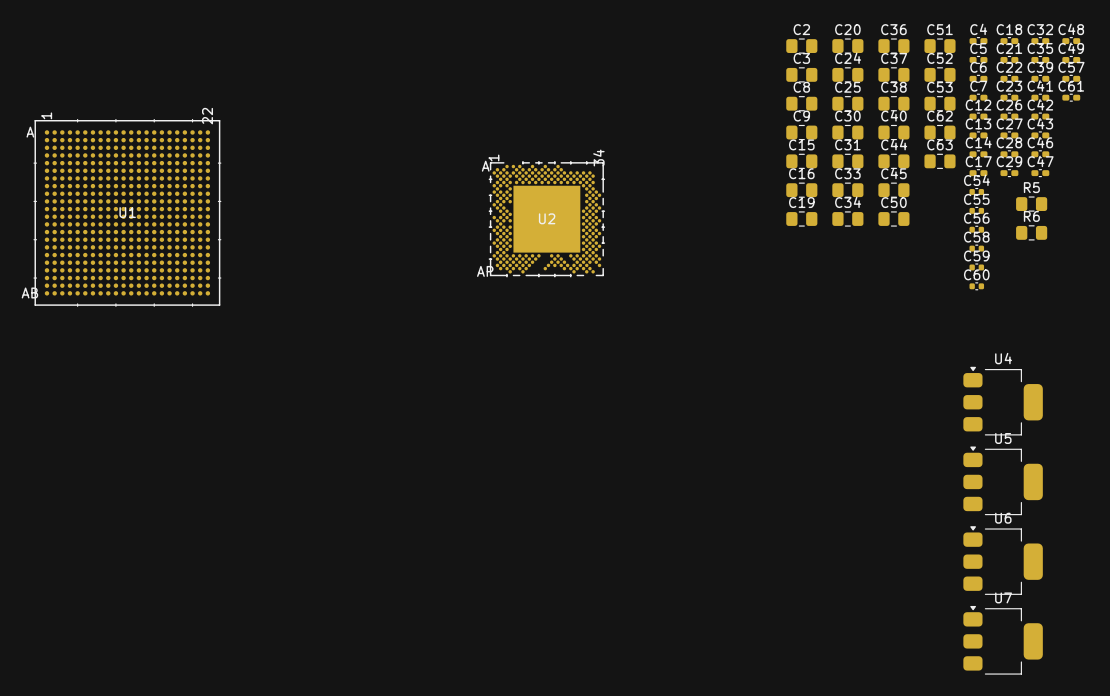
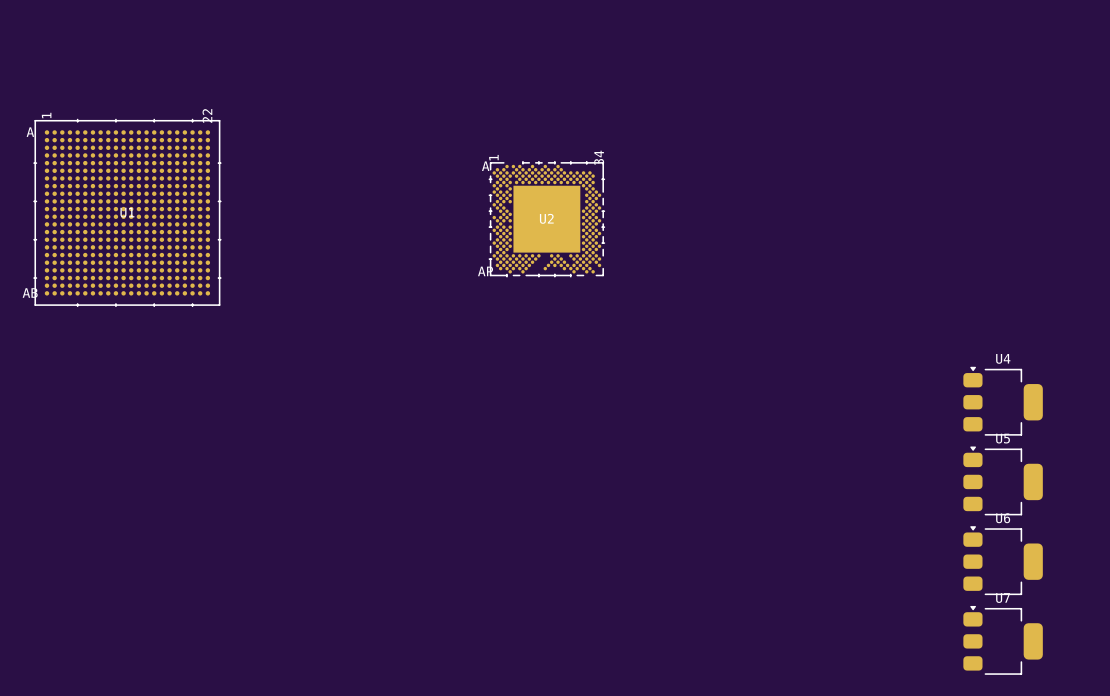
C4: (978, 41) -> none
C18: (1009, 41) -> none
C32: (1040, 41) -> none
C48: (1071, 41) -> none
C2: (801, 46) -> none
C20: (847, 46) -> none
C36: (893, 46) -> none
C51: (939, 46) -> none
C5: (978, 59) -> none
C21: (1009, 59) -> none
C35: (1040, 59) -> none
C49: (1071, 59) -> none
C3: (801, 74) -> none
C24: (847, 74) -> none
C37: (893, 74) -> none
C52: (939, 74) -> none
C6: (978, 78) -> none
C22: (1009, 78) -> none
C39: (1040, 78) -> none
C57: (1071, 78) -> none
C7: (978, 97) -> none
C23: (1009, 97) -> none
C41: (1040, 97) -> none
C61: (1071, 97) -> none
C8: (801, 103) -> none
C25: (847, 103) -> none
C38: (893, 103) -> none
C53: (939, 103) -> none
C12: (978, 116) -> none
C26: (1009, 116) -> none
C42: (1040, 116) -> none
C9: (801, 132) -> none
C30: (847, 132) -> none
C40: (893, 132) -> none
C62: (939, 132) -> none
C13: (978, 135) -> none
C27: (1009, 135) -> none
C43: (1040, 135) -> none
C14: (978, 154) -> none
C28: (1009, 154) -> none
C46: (1040, 154) -> none
C15: (801, 161) -> none
C31: (847, 161) -> none
C44: (893, 161) -> none
C63: (939, 161) -> none
C17: (978, 173) -> none
C29: (1009, 173) -> none
C47: (1040, 173) -> none
C16: (801, 190) -> none
C33: (847, 190) -> none
C45: (893, 190) -> none
C54: (976, 191) -> none
R5: (1031, 204) -> none
C55: (976, 210) -> none
C19: (801, 218) -> none
C34: (847, 218) -> none
C50: (893, 218) -> none
C56: (976, 229) -> none
R6: (1031, 232) -> none
C58: (976, 248) -> none
C59: (976, 267) -> none
C60: (976, 286) -> none

